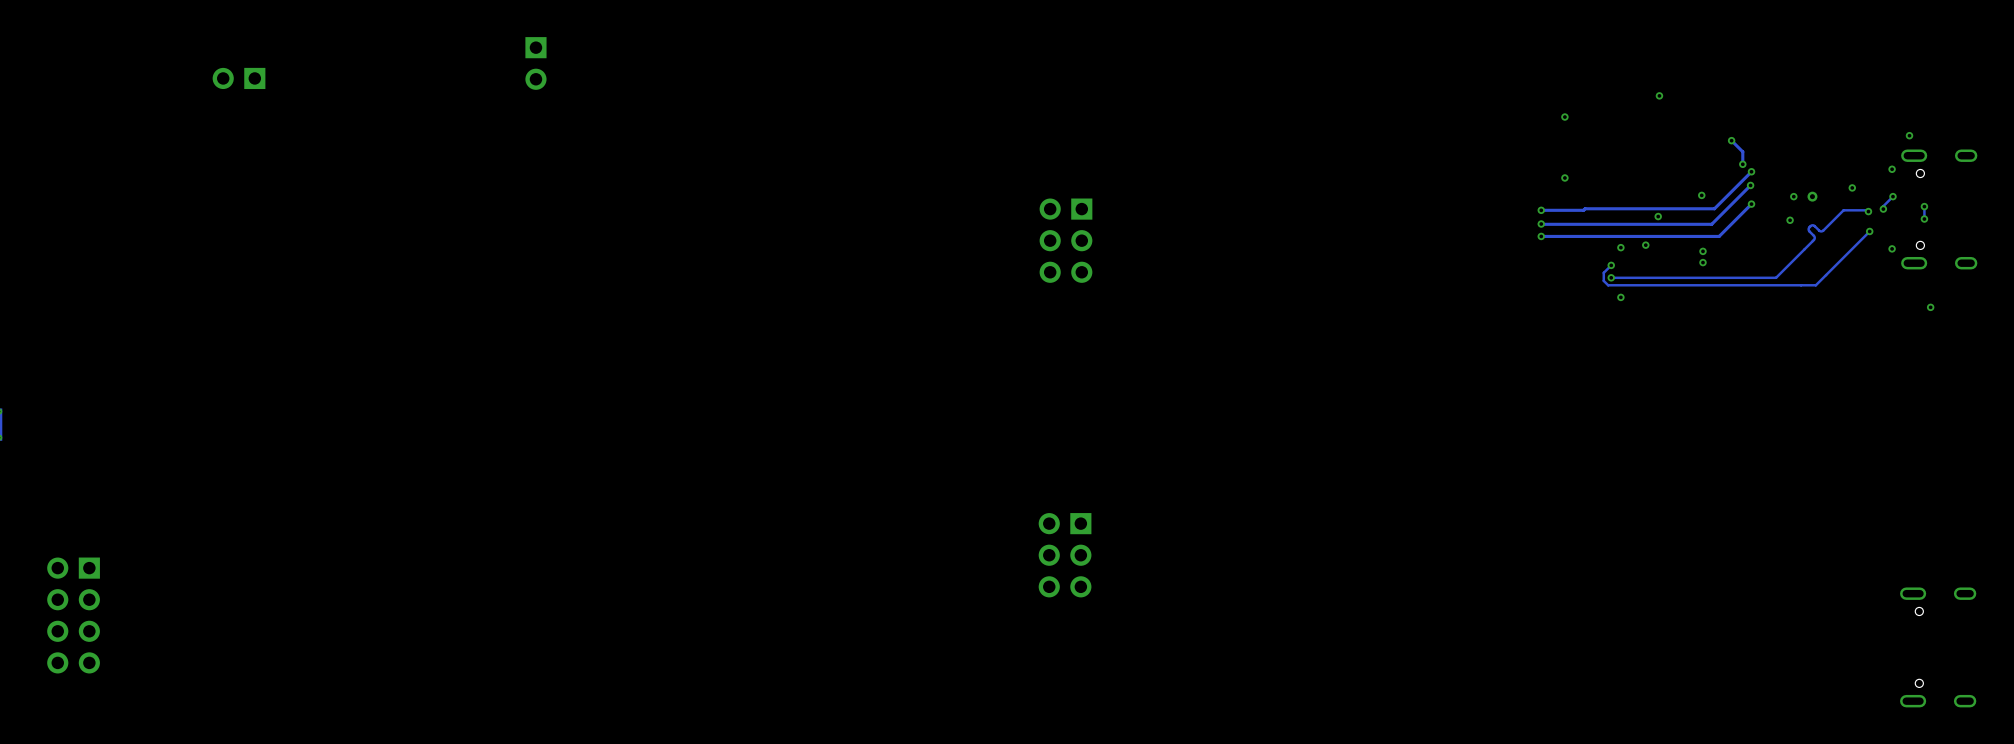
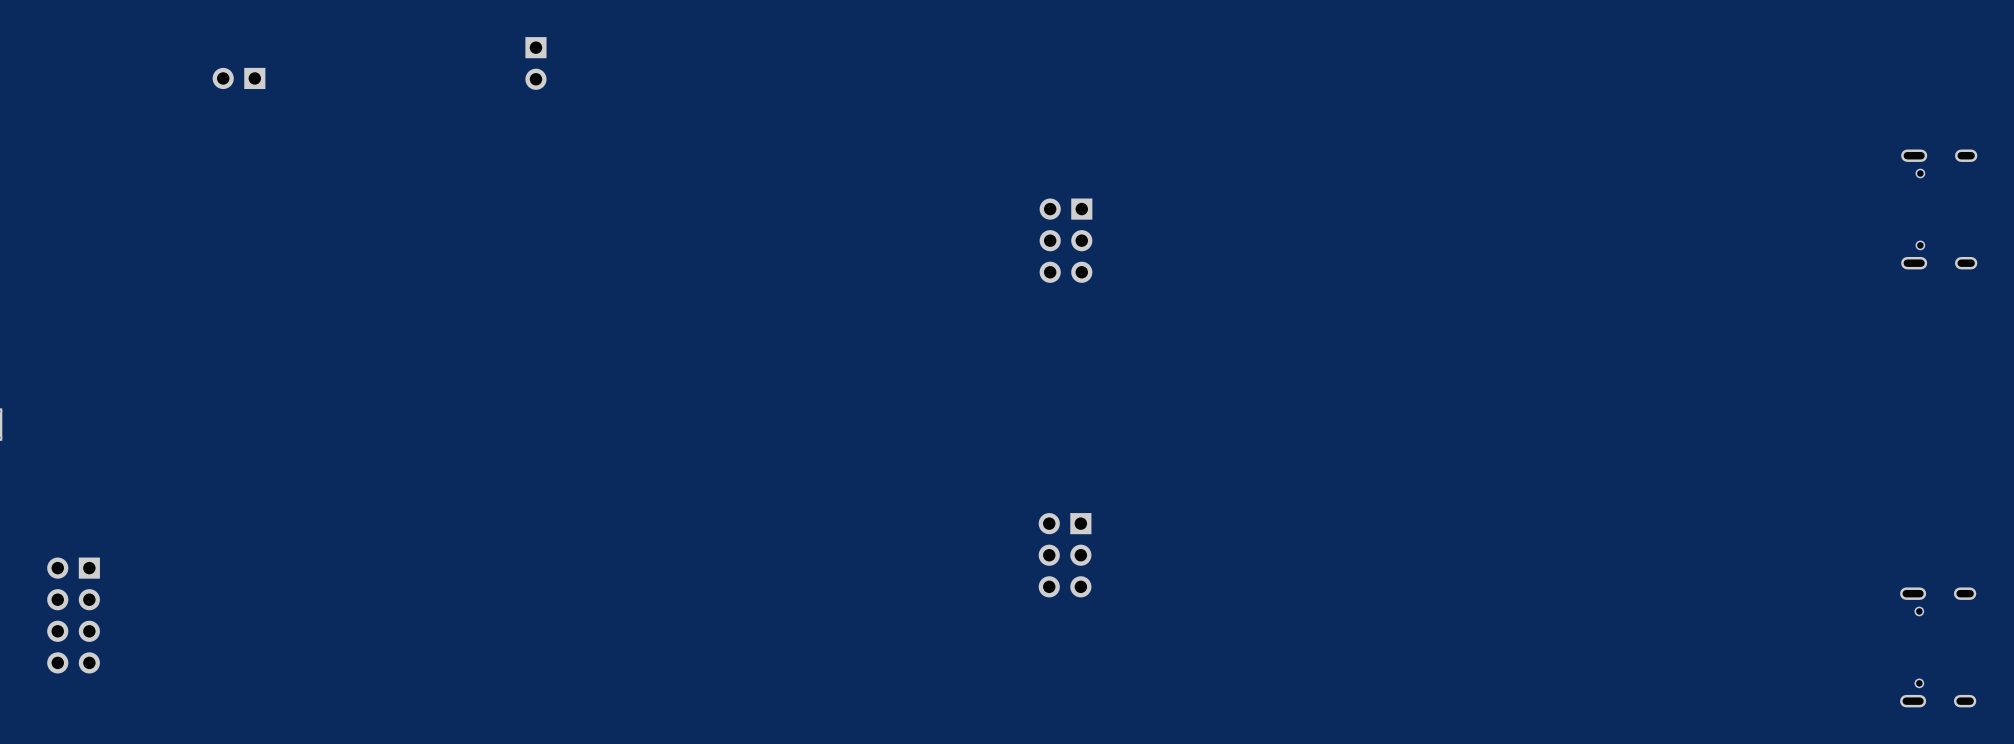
via: (1659, 95) -> none
via: (1564, 117) -> none
via: (1909, 135) -> none
track: (1731, 140) (1742, 151) (1742, 164) -> none
via: (1731, 140) -> none
via: (1742, 164) -> none
via: (1892, 169) -> none
track: (1751, 171) (1714, 208) (1541, 210) -> none
via: (1751, 171) -> none
via: (1564, 177) -> none
track: (1750, 185) (1711, 224) (1541, 224) -> none
via: (1750, 185) -> none
via: (1852, 187) -> none
via: (1701, 195) -> none
via: (1793, 196) -> none
via: (1812, 196) -> none
track: (1892, 196) (1883, 206) (1883, 209) -> none
via: (1892, 196) -> none
track: (1751, 204) (1719, 236) (1541, 236) -> none
via: (1751, 204) -> none
track: (1924, 206) (1924, 219) -> none
via: (1924, 206) -> none
via: (1883, 209) -> none
via: (1541, 210) -> none
track: (1868, 211) (1843, 210) (1822, 231) (1813, 225) (1810, 225) (1808, 230) (1814, 236) (1814, 239) (1776, 277) (1611, 277) -> none
via: (1868, 211) -> none
via: (1658, 216) -> none
via: (1924, 219) -> none
via: (1790, 220) -> none
via: (1541, 224) -> none
track: (1869, 231) (1815, 285) (1608, 285) (1603, 280) (1603, 272) (1611, 265) -> none
via: (1869, 231) -> none
via: (1541, 236) -> none
via: (1645, 245) -> none
via: (1620, 247) -> none
via: (1892, 248) -> none
via: (1702, 251) -> none
via: (1702, 262) -> none
via: (1611, 265) -> none
via: (1611, 277) -> none
via: (1620, 297) -> none
via: (1930, 307) -> none

